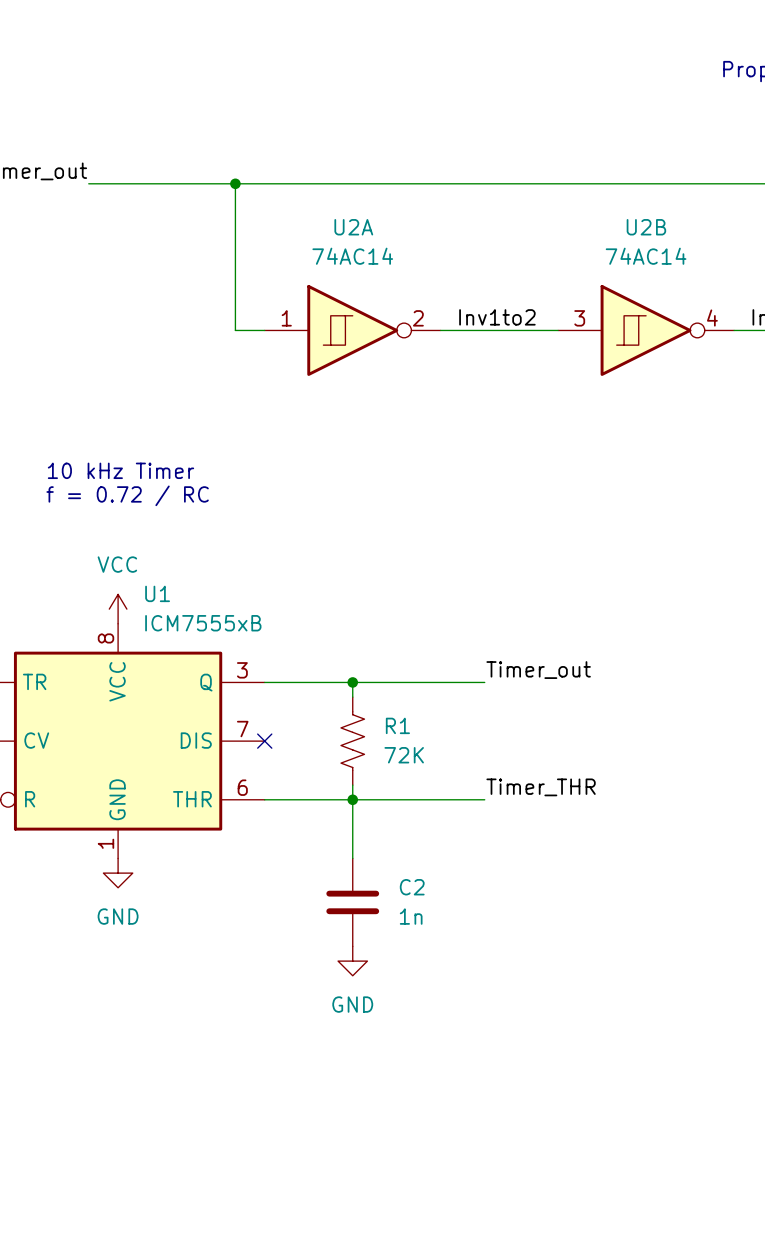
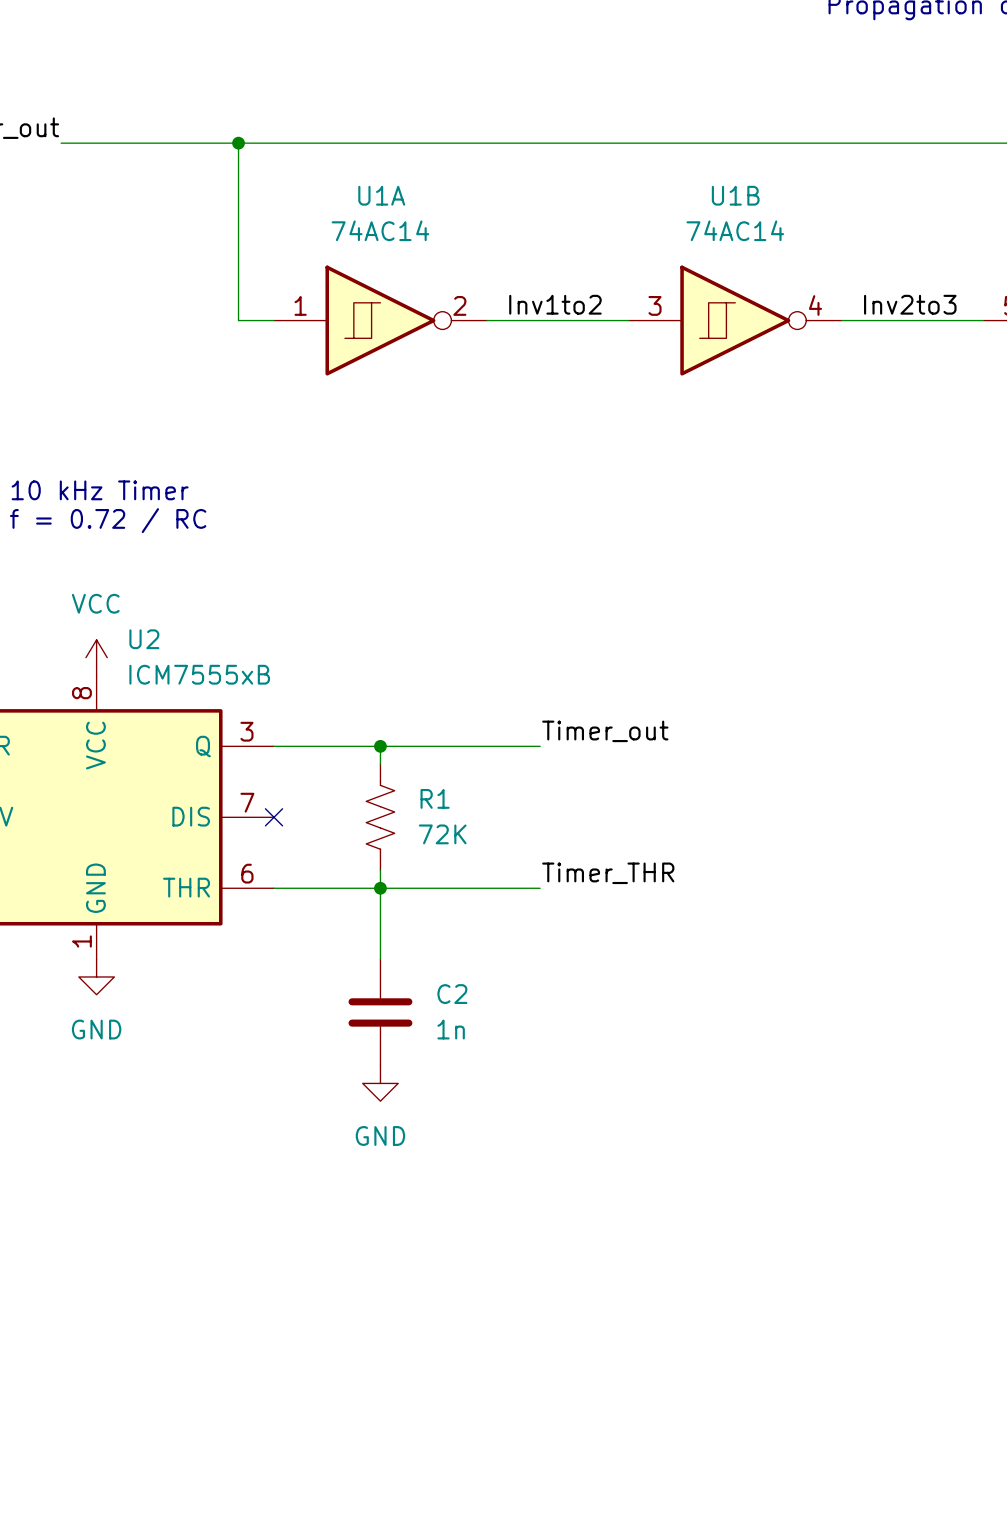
U2A name: U2A (353, 227) -> U1A (381, 195)
U2B name: U2B (646, 227) -> U1B (735, 195)
U1 name: U1 (157, 593) -> U2 (144, 639)

